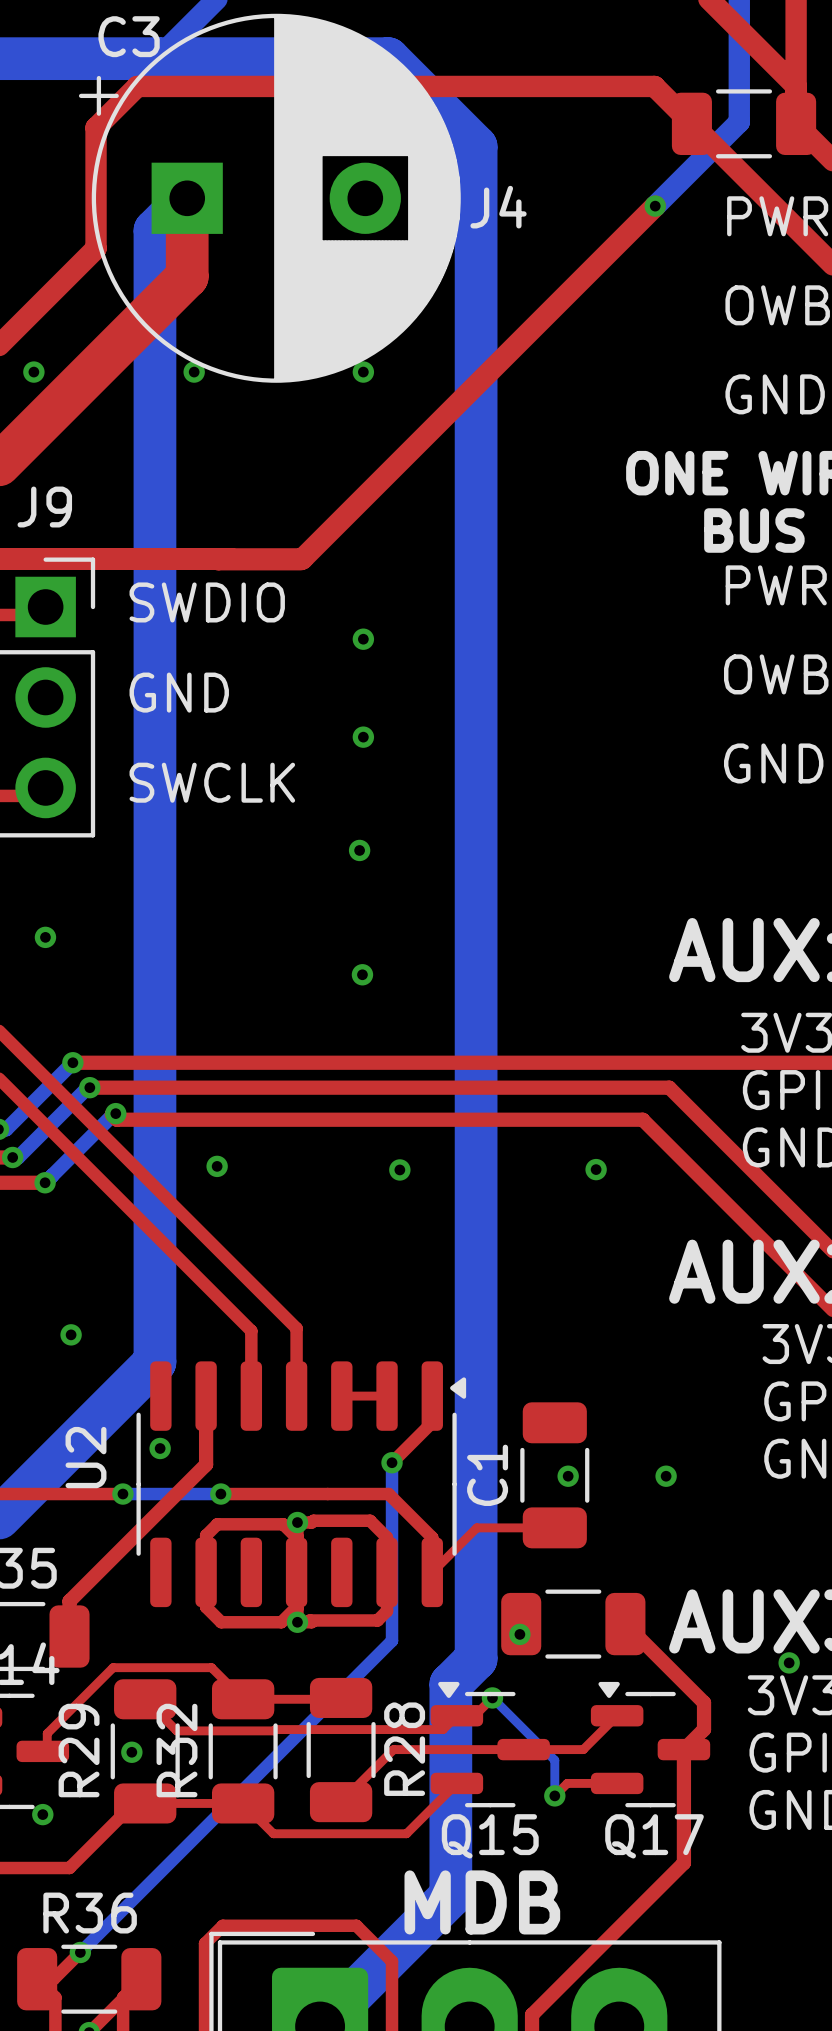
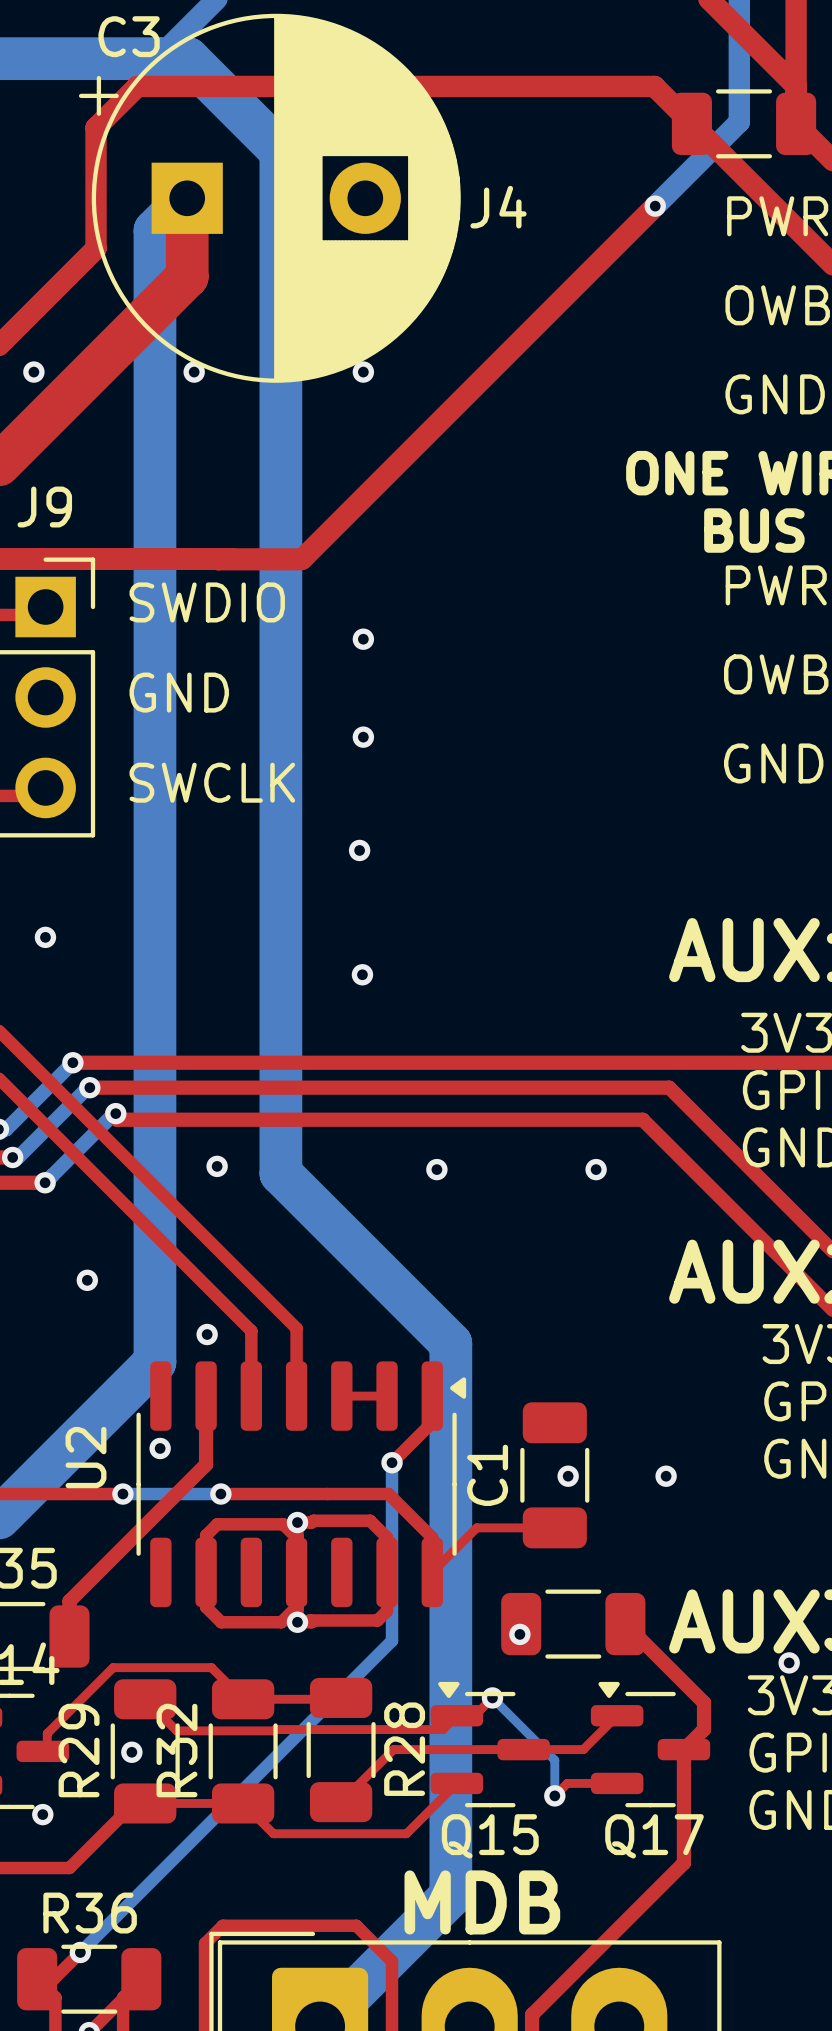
bottom track: (188, 58) (388, 58) (476, 146) (476, 1658) (450, 1684) -> (188, 58) (280, 151) (280, 1173) (450, 1343) (450, 1684)
via position: (399, 1169) -> (436, 1169)
via position: (71, 1334) -> (87, 1280)
via: none -> (207, 1334)

